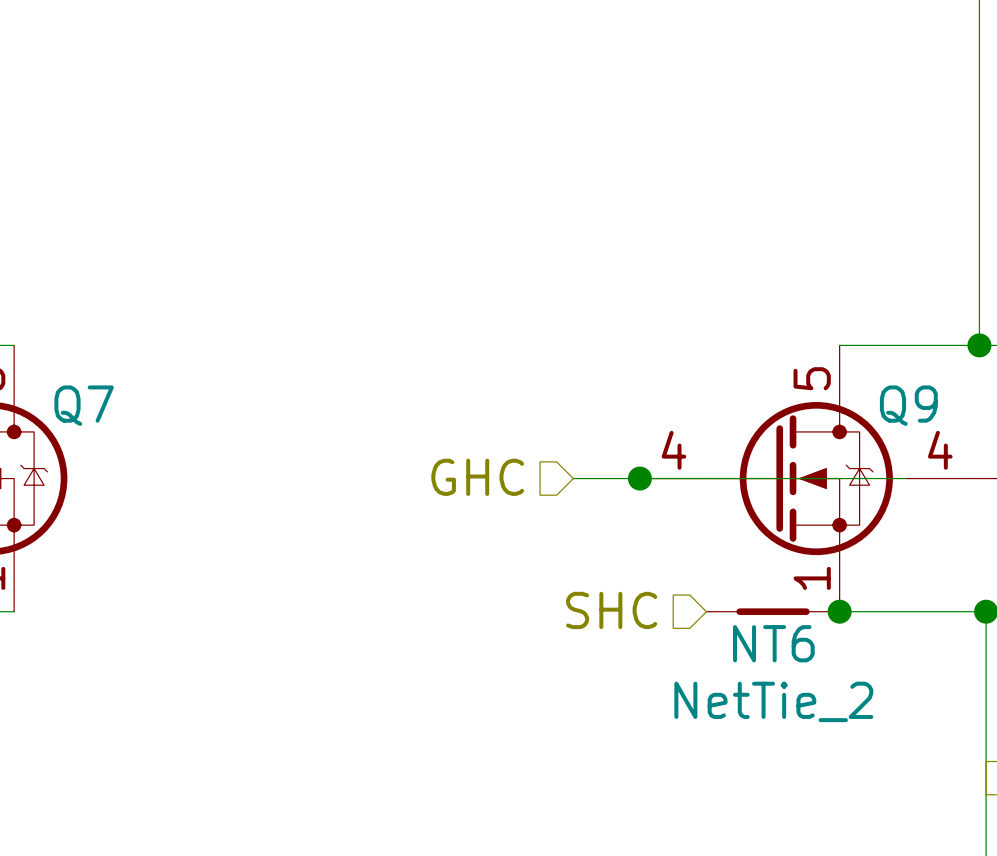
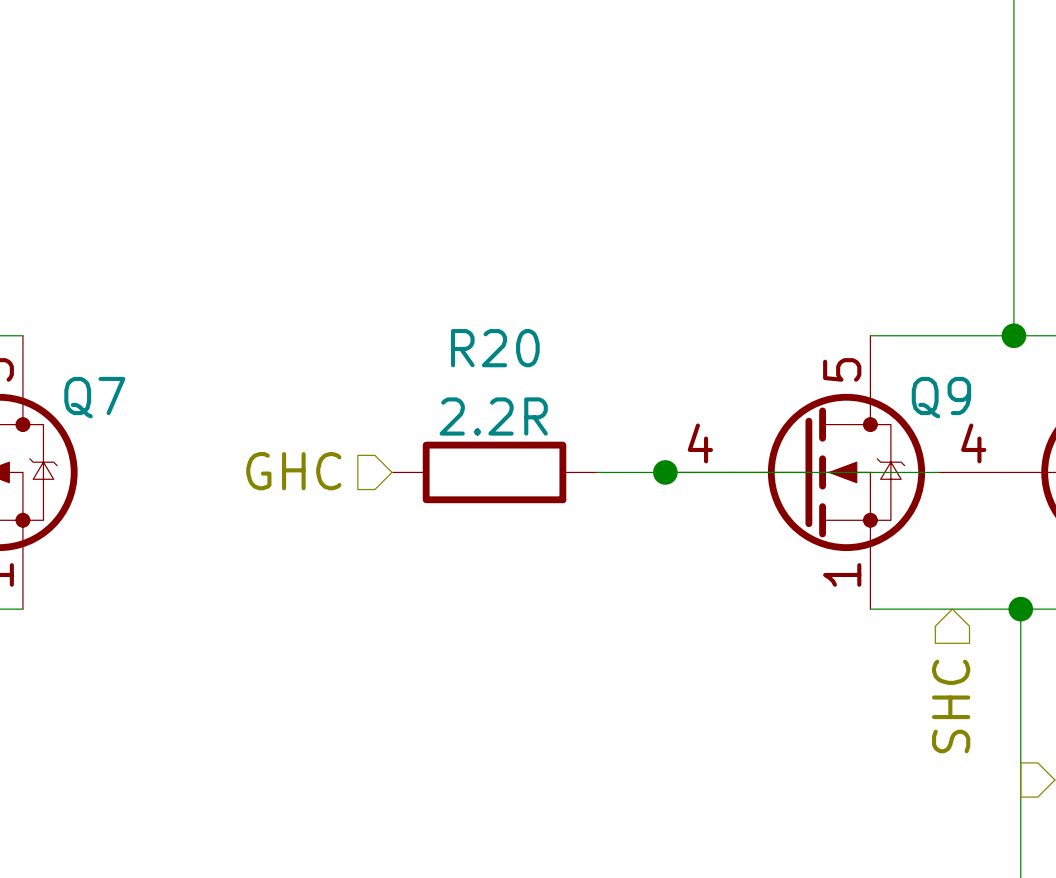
hierarchical label position: GHC (477, 477) -> GHC (293, 471)
R20: none -> 2.2R (494, 472)
hierarchical label rotation: 0° (611, 610) -> 90° counterclockwise (951, 706)
hierarchical label position: SHC (611, 610) -> SHC (951, 706)
NT6: NetTie_2 (773, 611) -> none
junction: (839, 611) -> none

